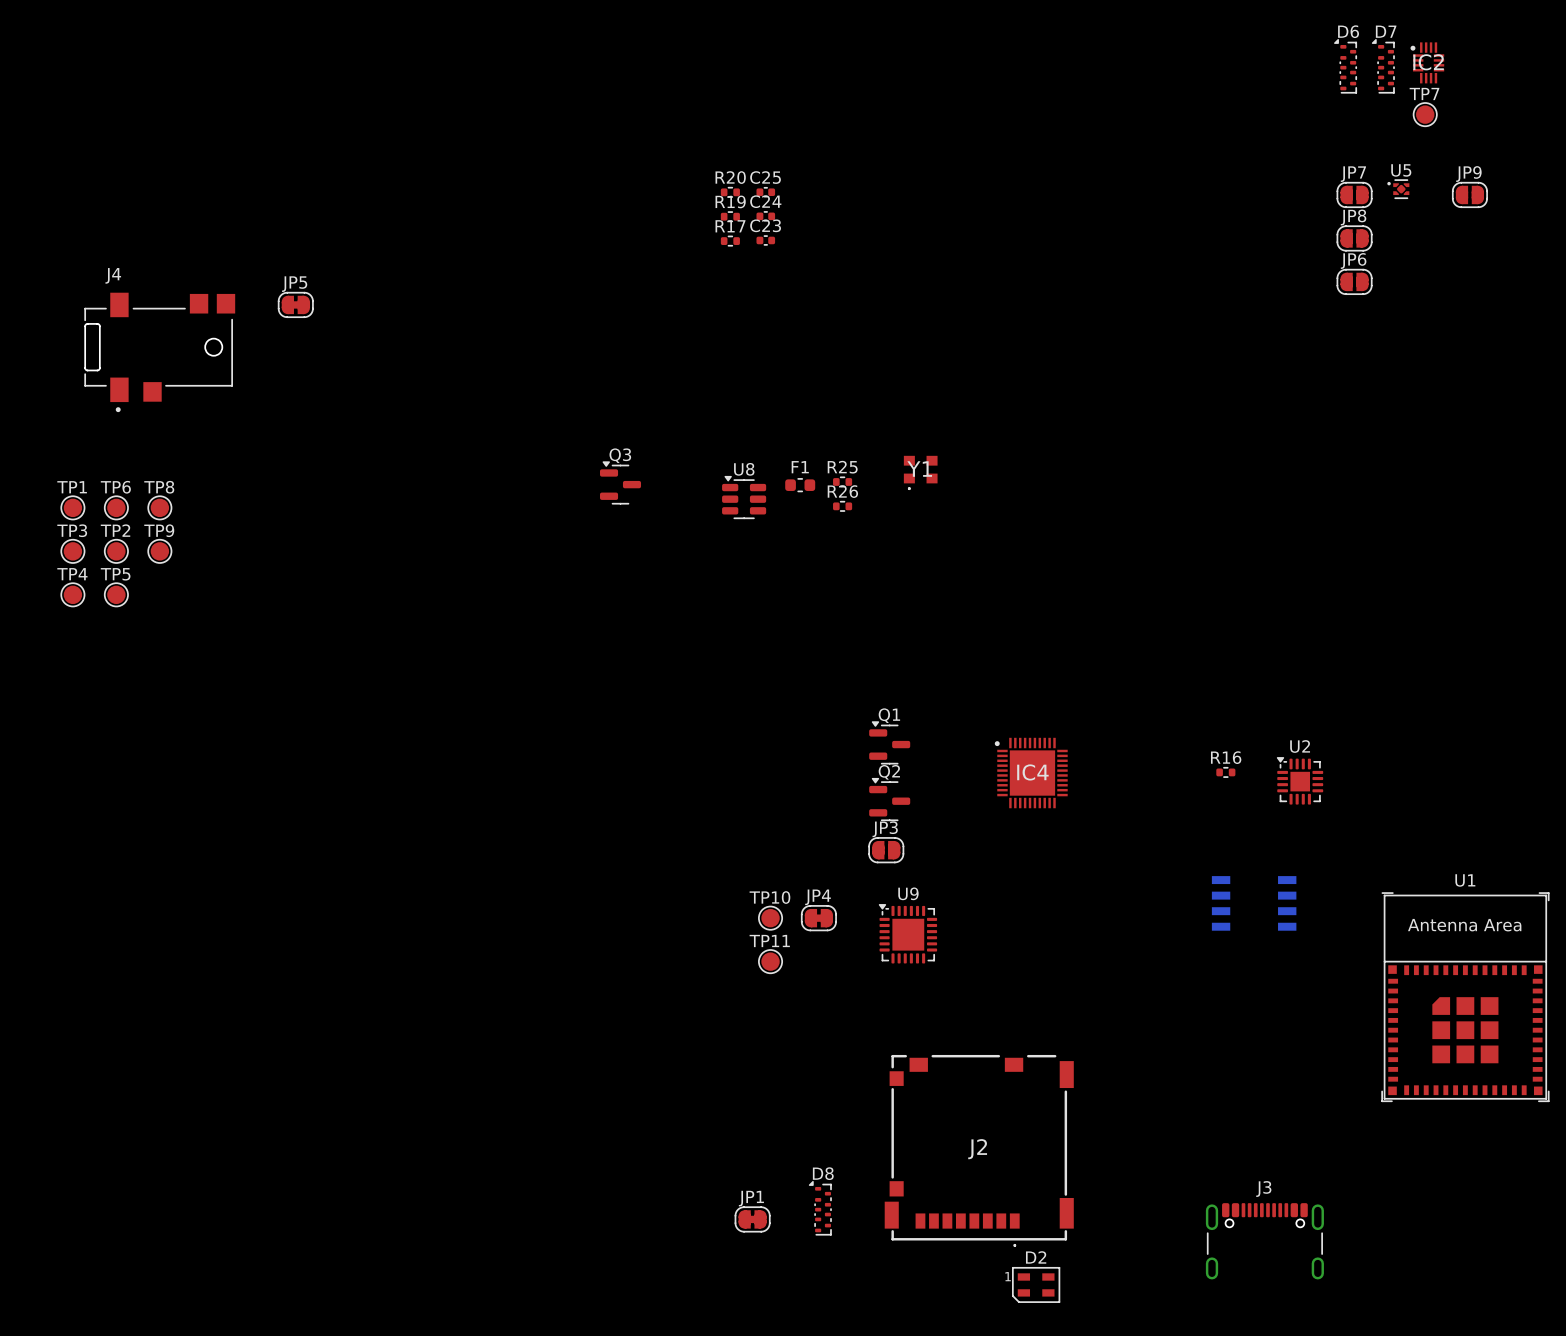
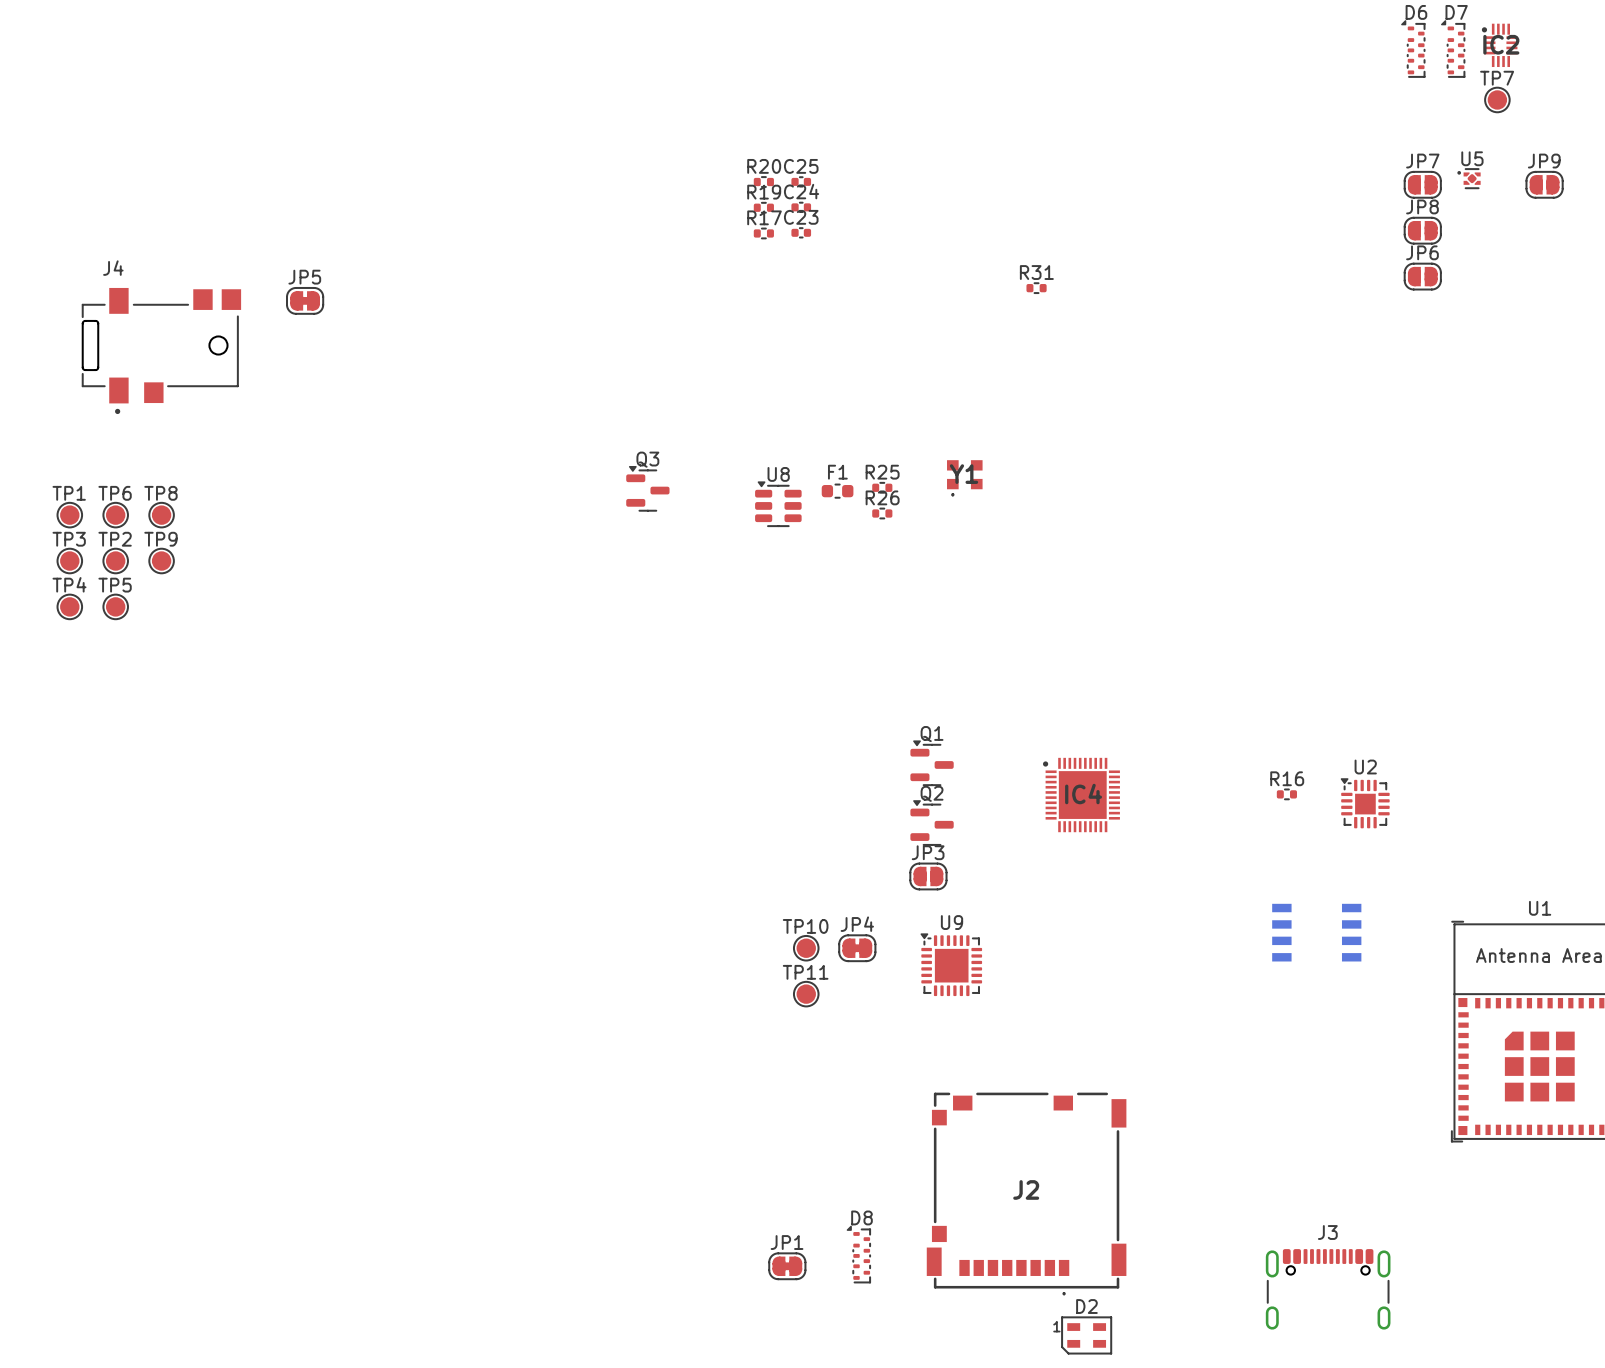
R31: none -> (1036, 288)

